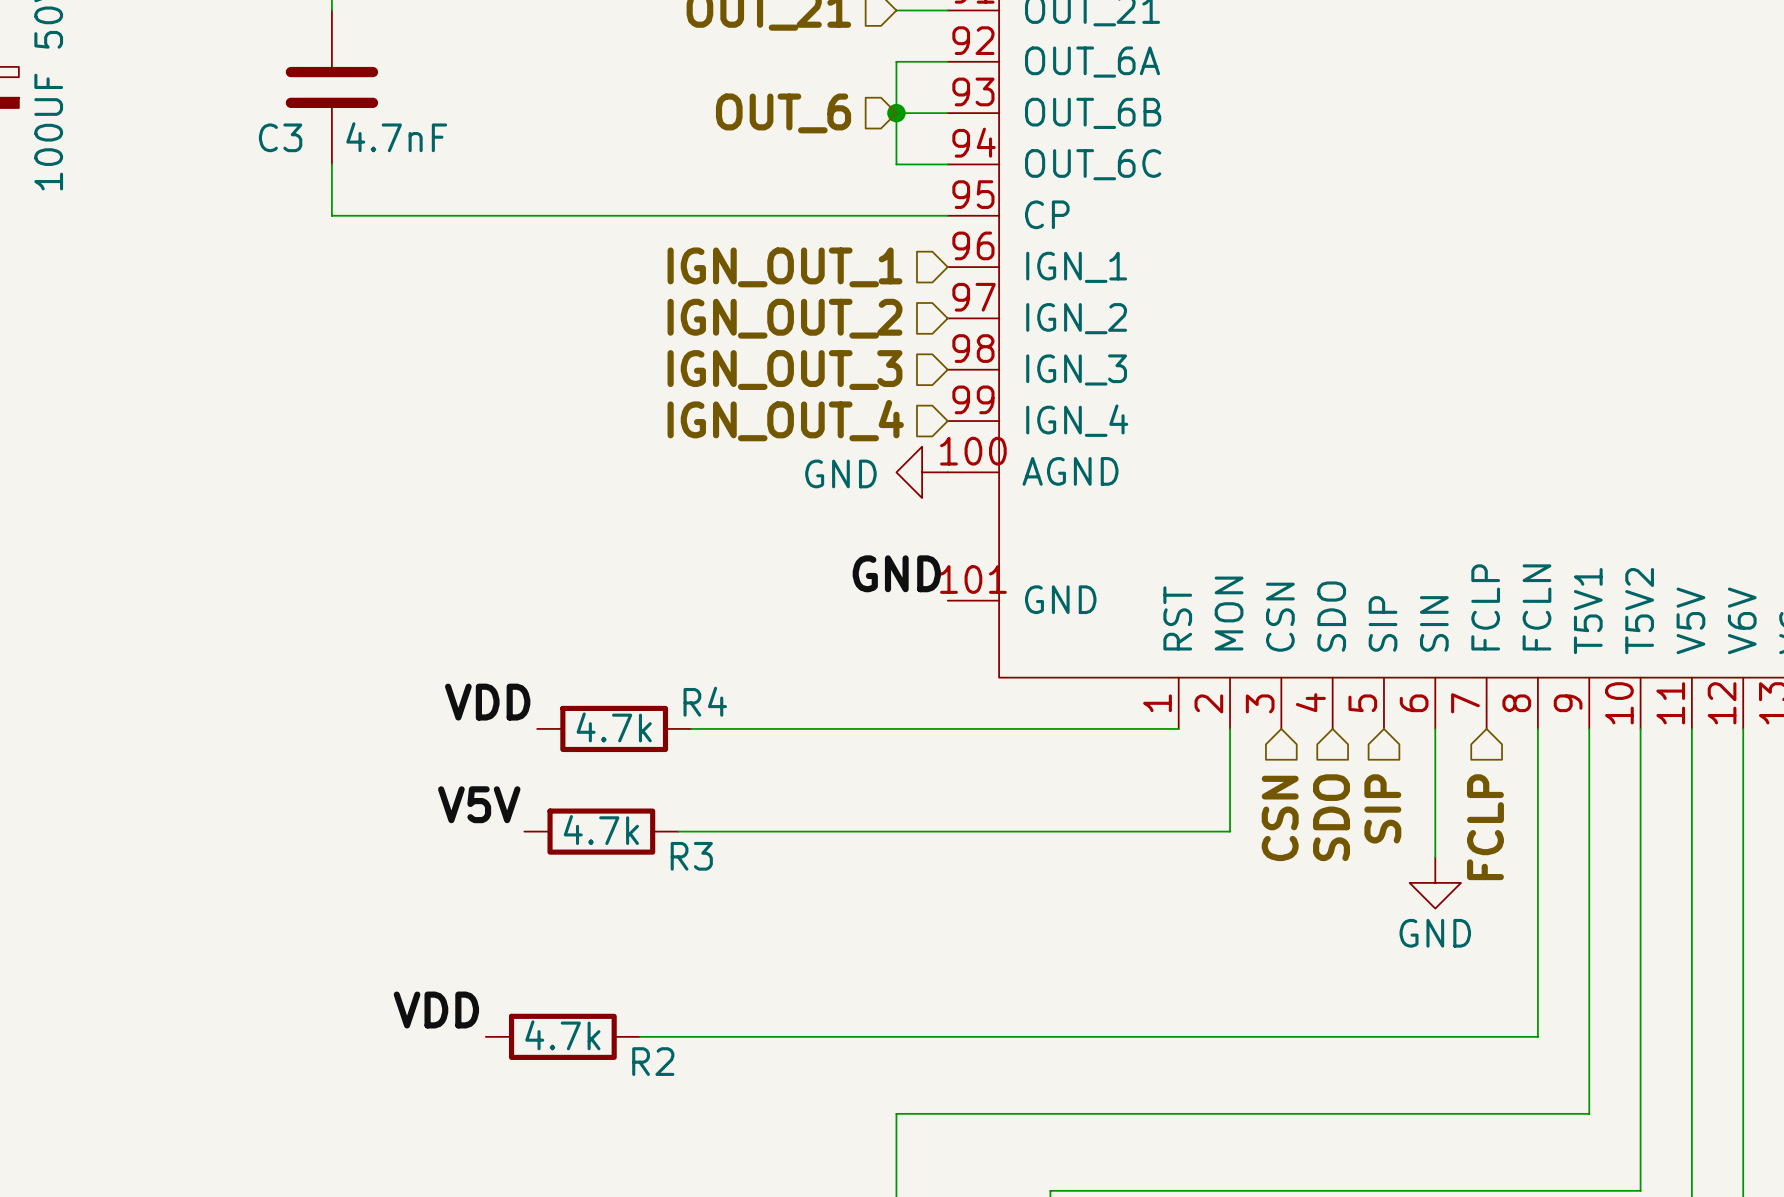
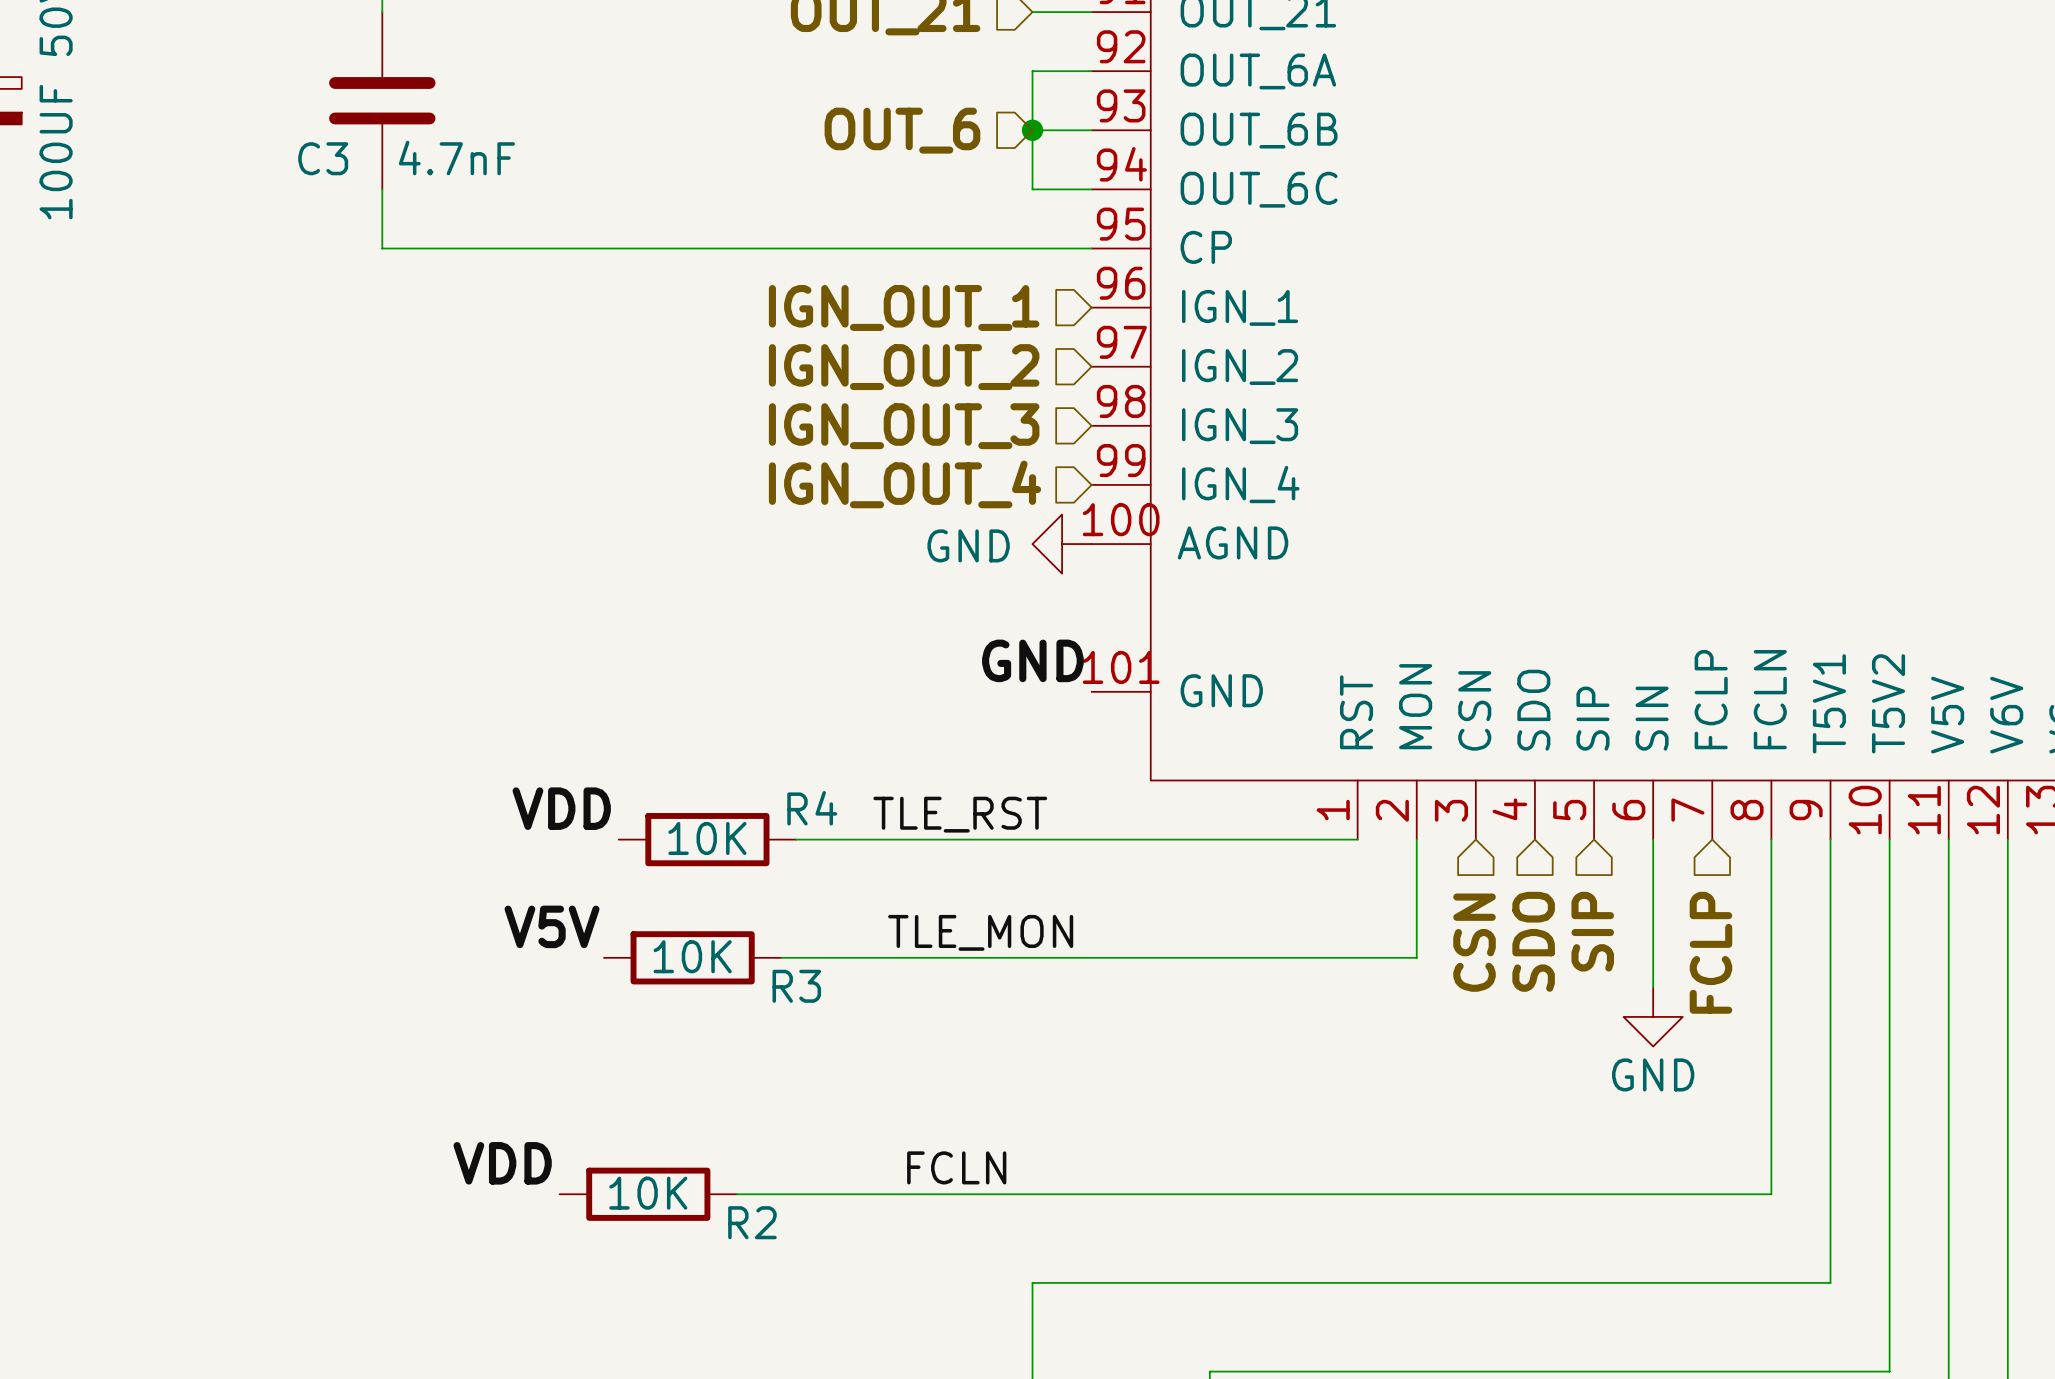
label: none -> TLE_RST (960, 814)
R4 value: 4.7k (614, 727) -> 10K (707, 838)
label: none -> TLE_MON (980, 932)
R3 value: 4.7k (601, 830) -> 10K (692, 956)
label: none -> FCLN (956, 1167)
R2 value: 4.7k (562, 1035) -> 10K (648, 1193)

